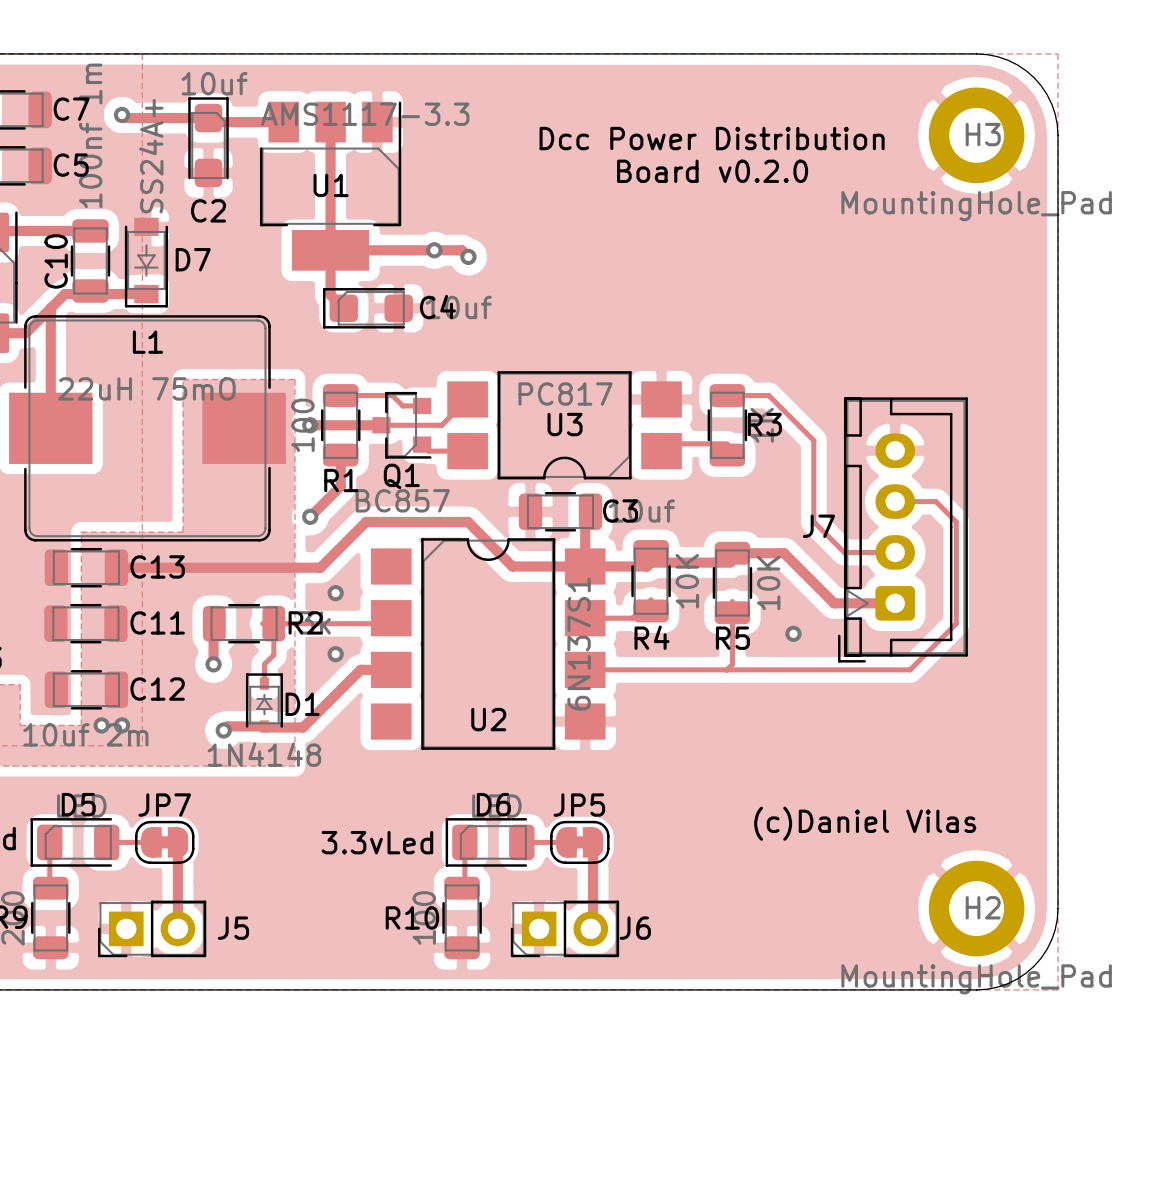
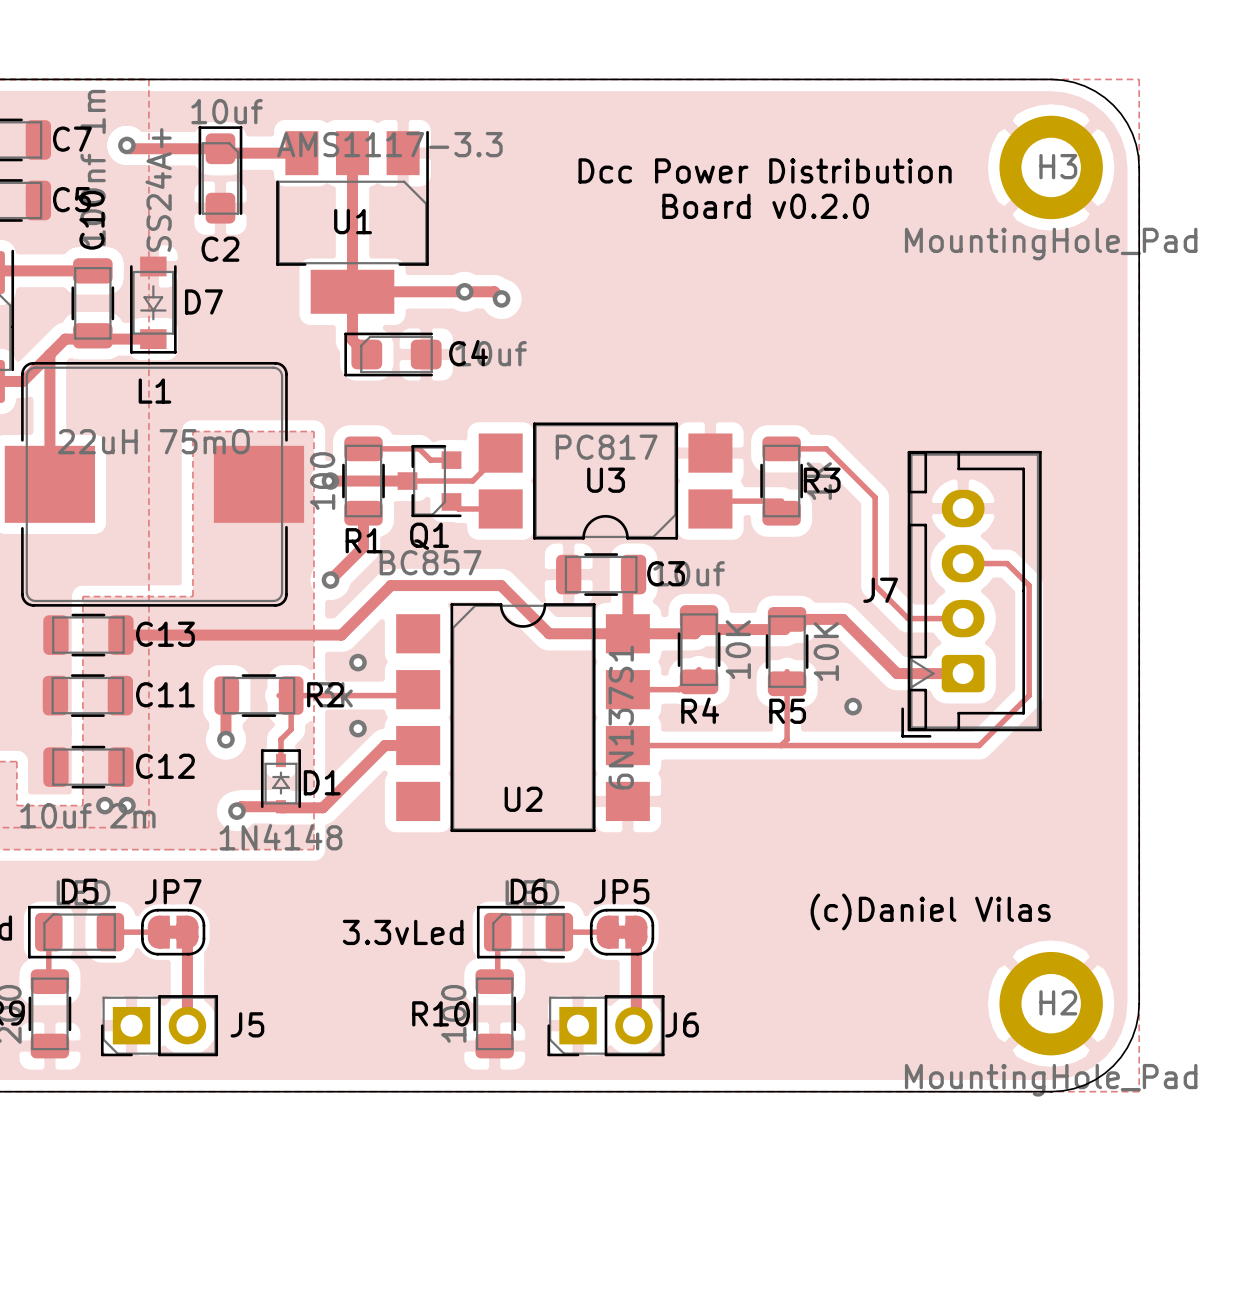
C10 name position: C10 (56, 261) -> C10 (92, 220)

